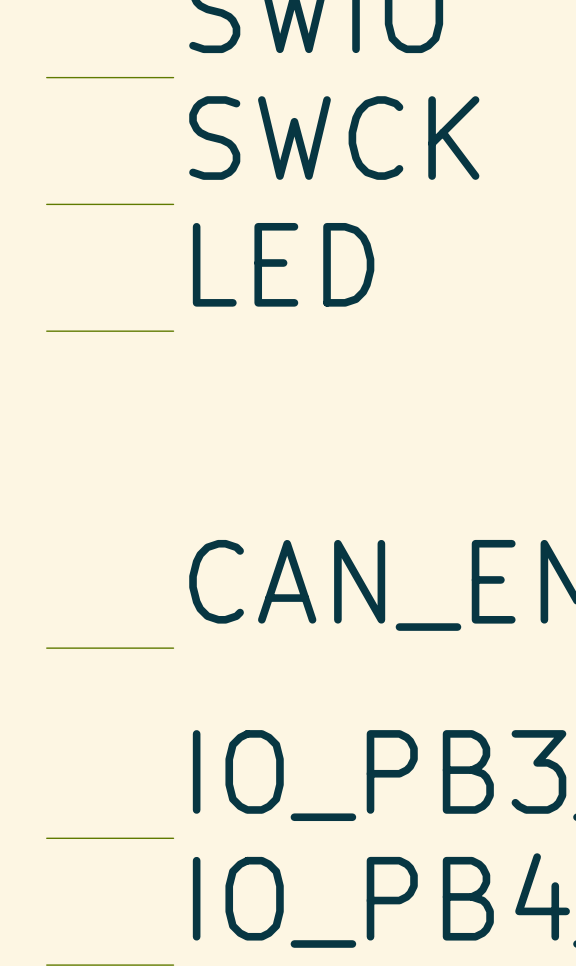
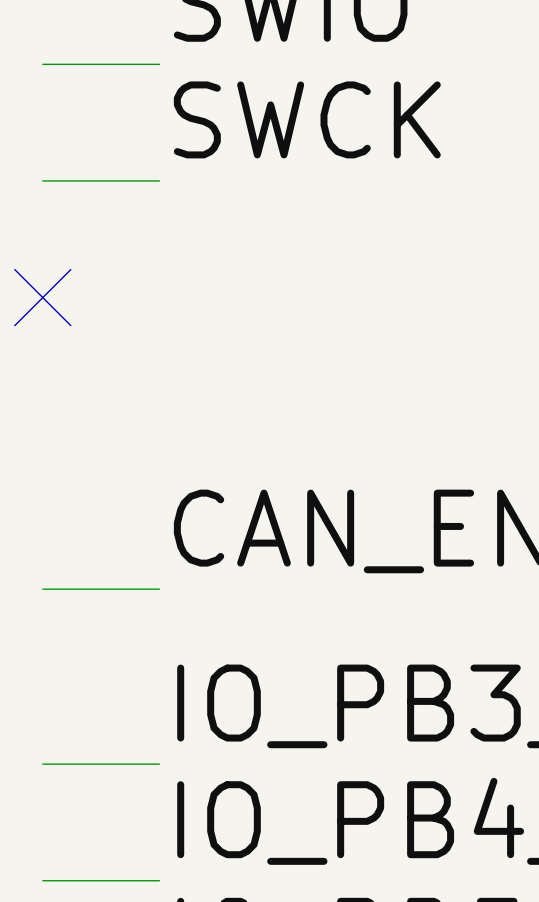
label: LED (283, 264) -> none
wire: (46, 331) (173, 331) -> none
no-connect mark: none -> (42, 297)

